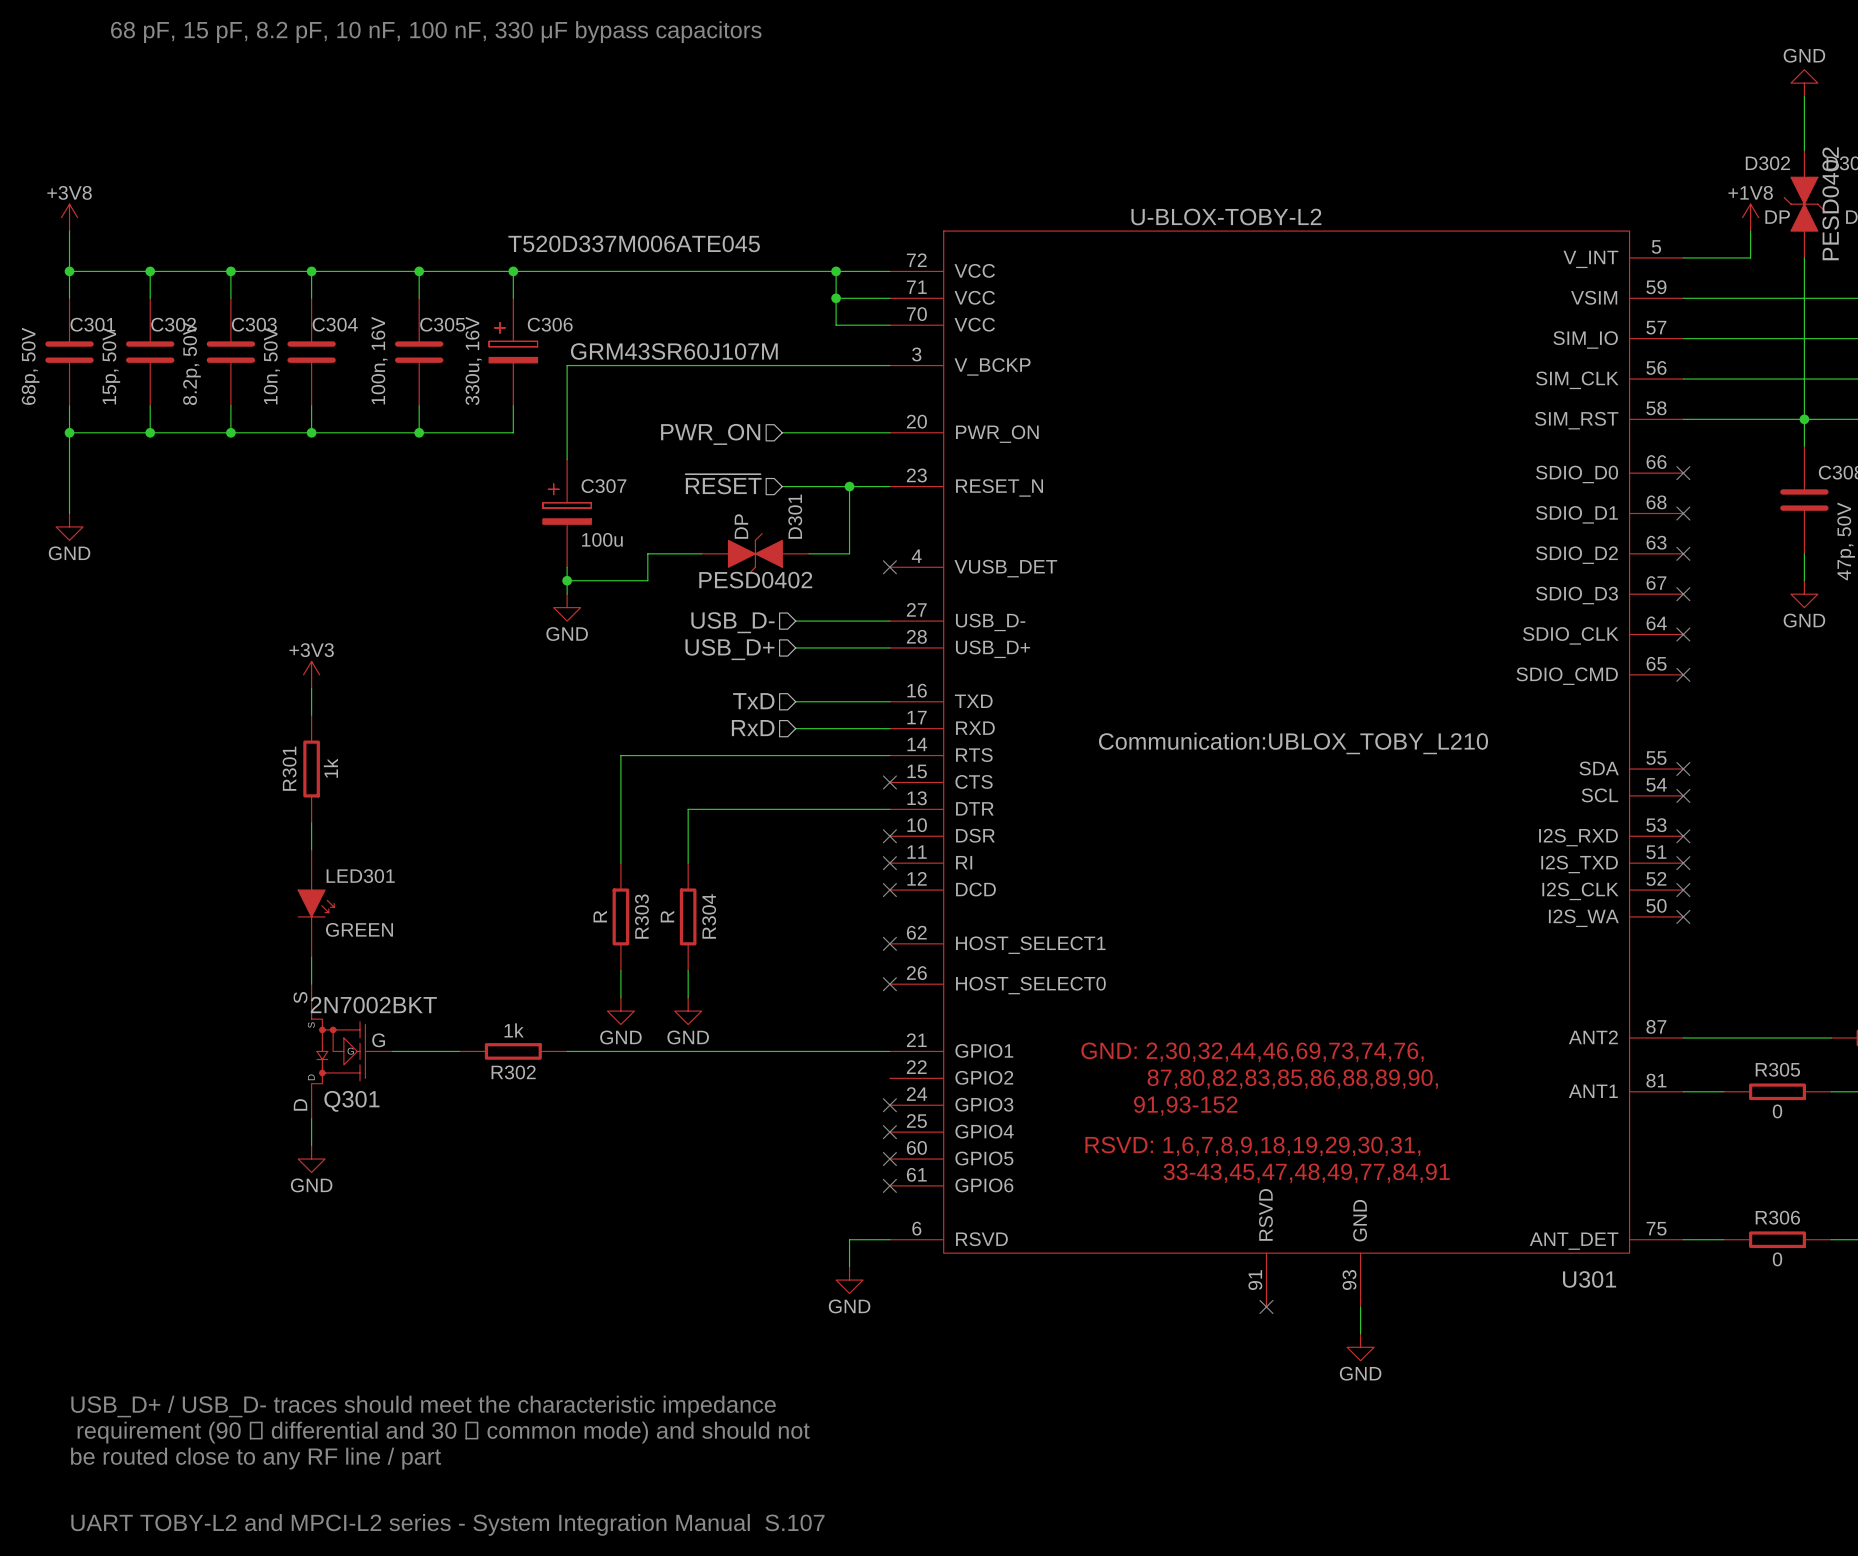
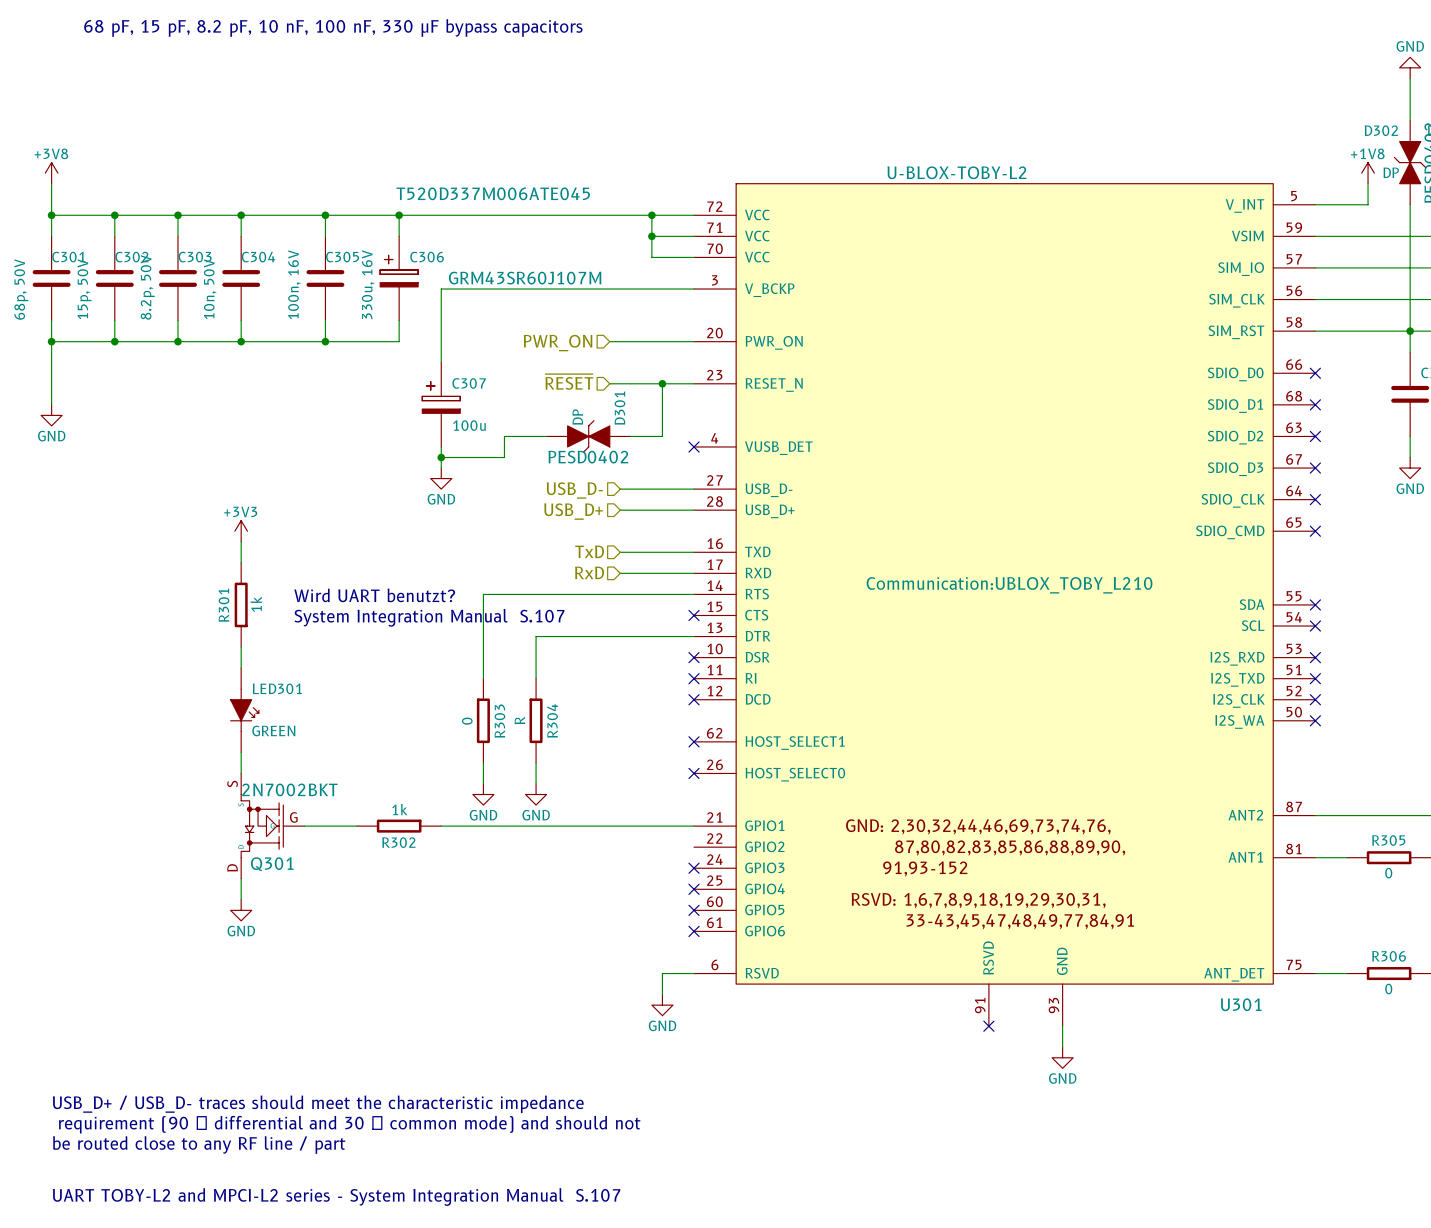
text: none -> Wird UART benutzt? (374, 595)
text: none -> System Integration Manual S.107 (429, 617)
R303 value: R (600, 916) -> 0 (467, 721)

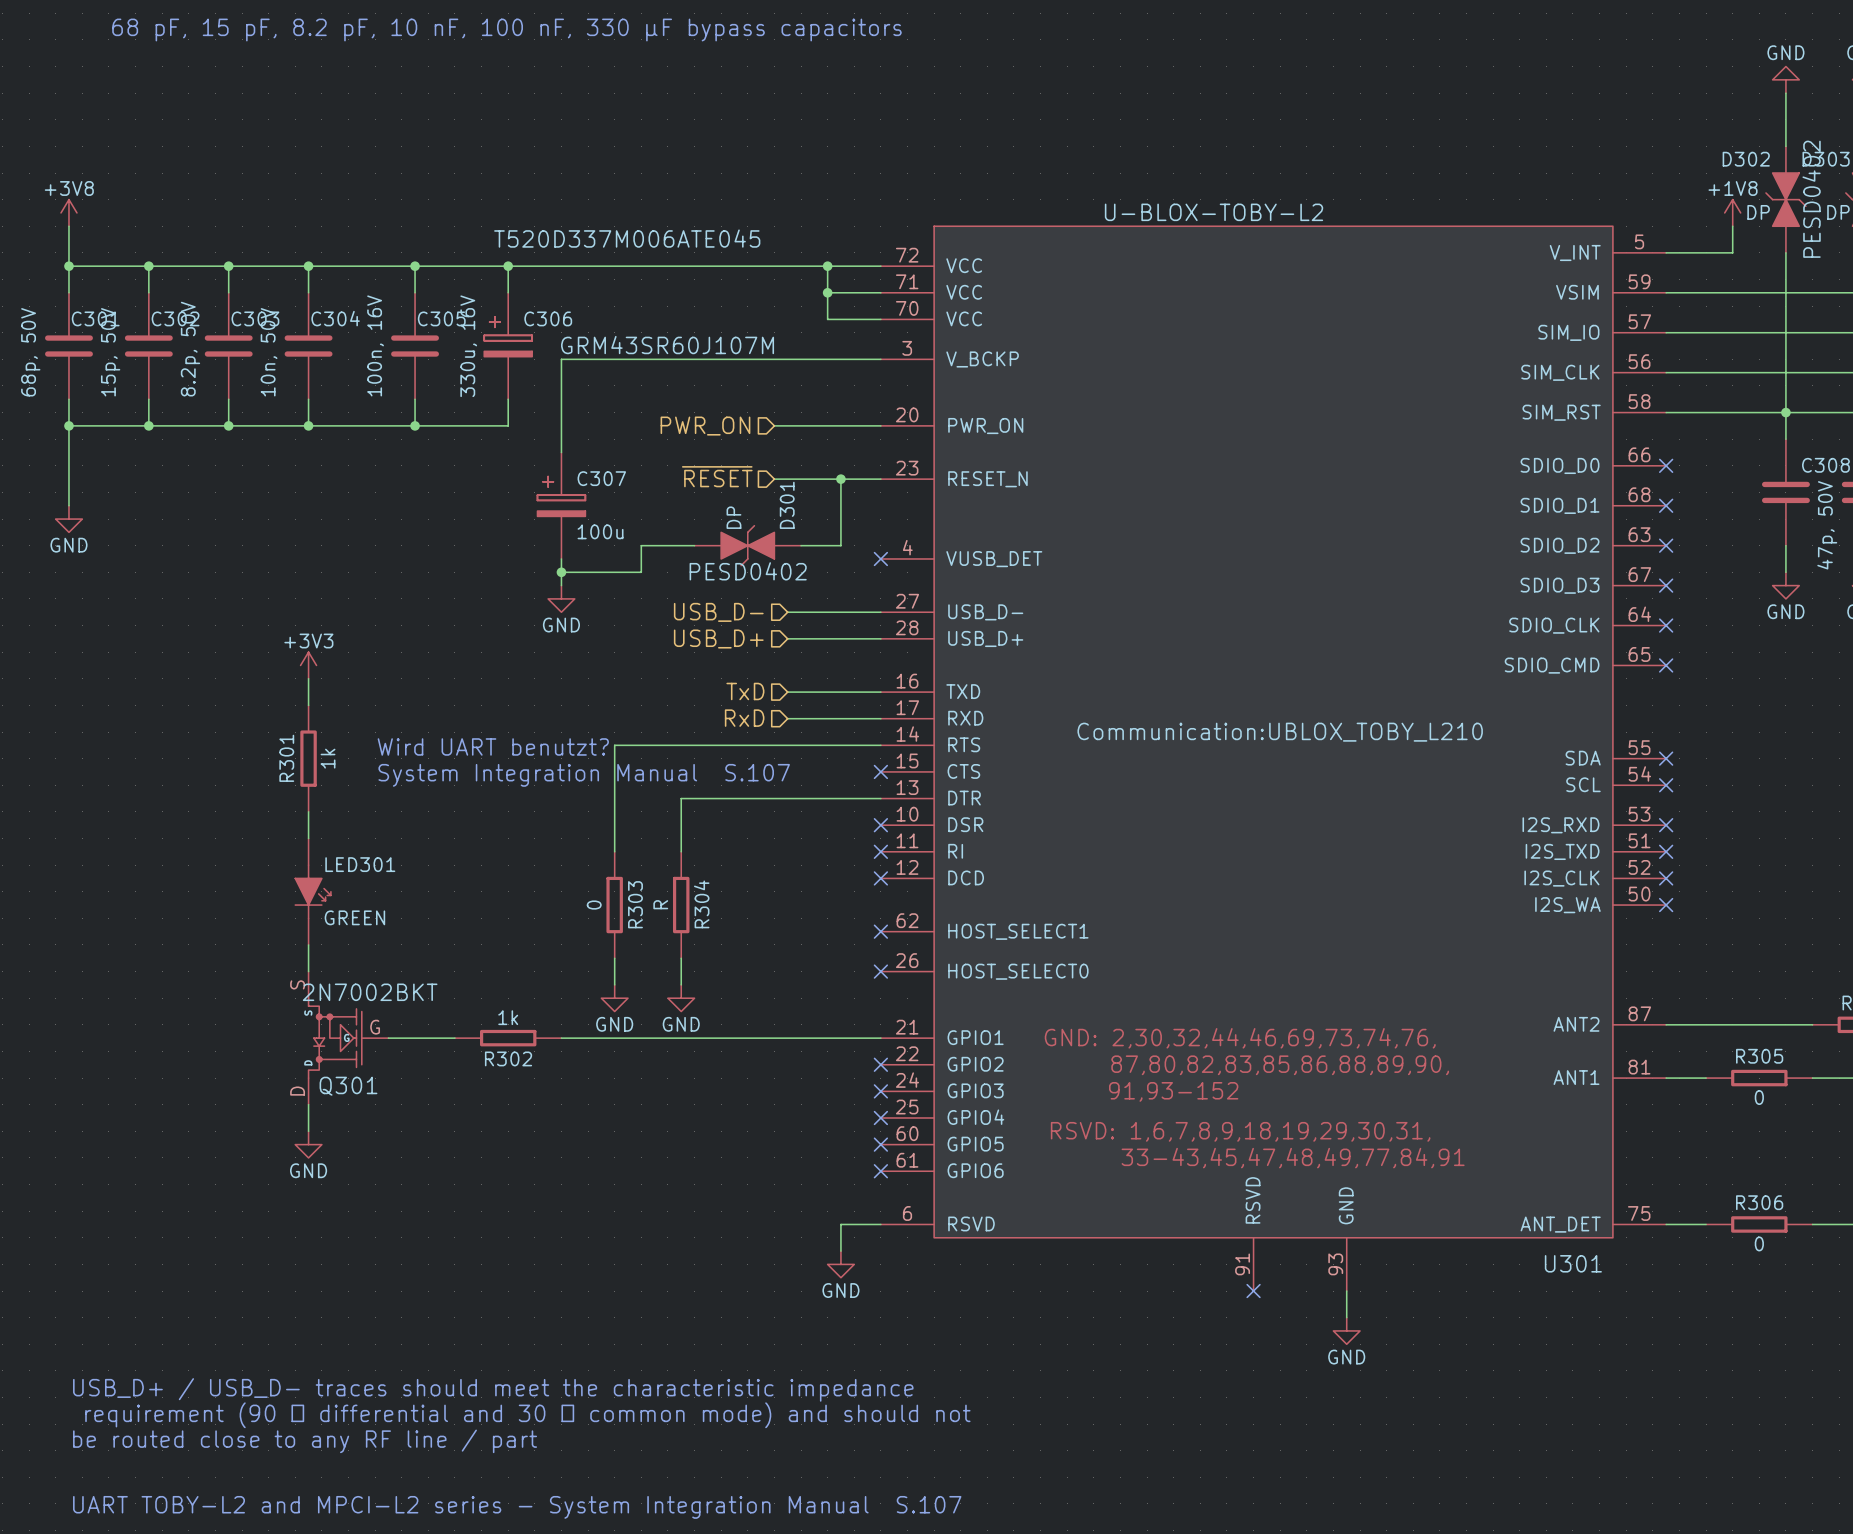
no-connect mark: none -> (880, 1064)

